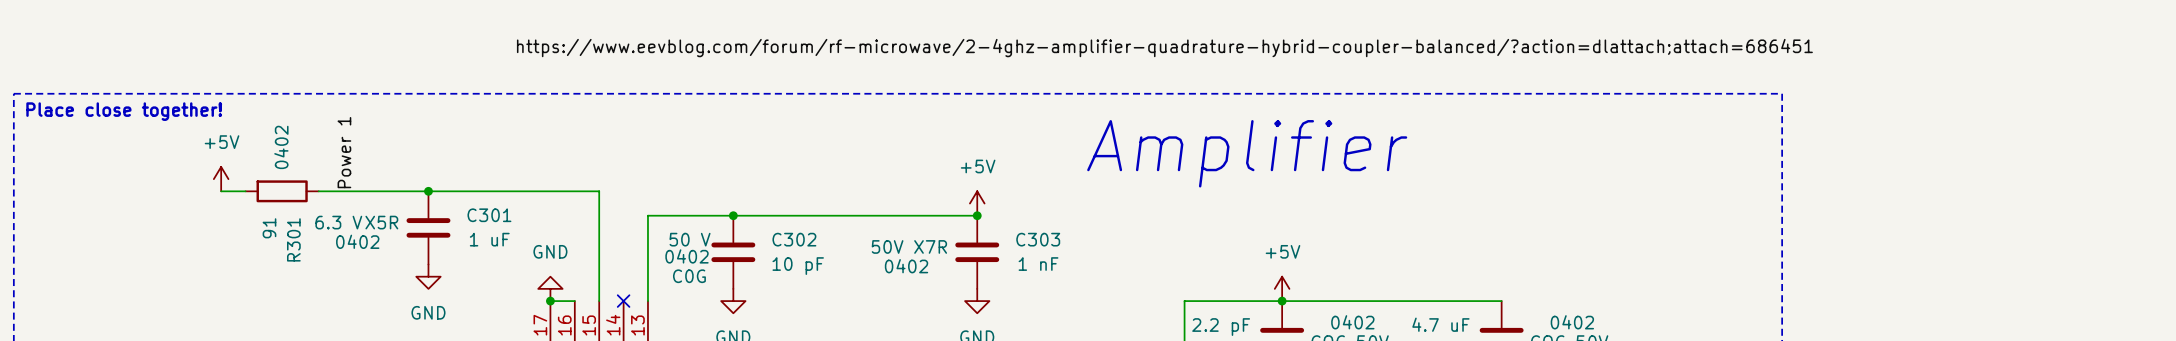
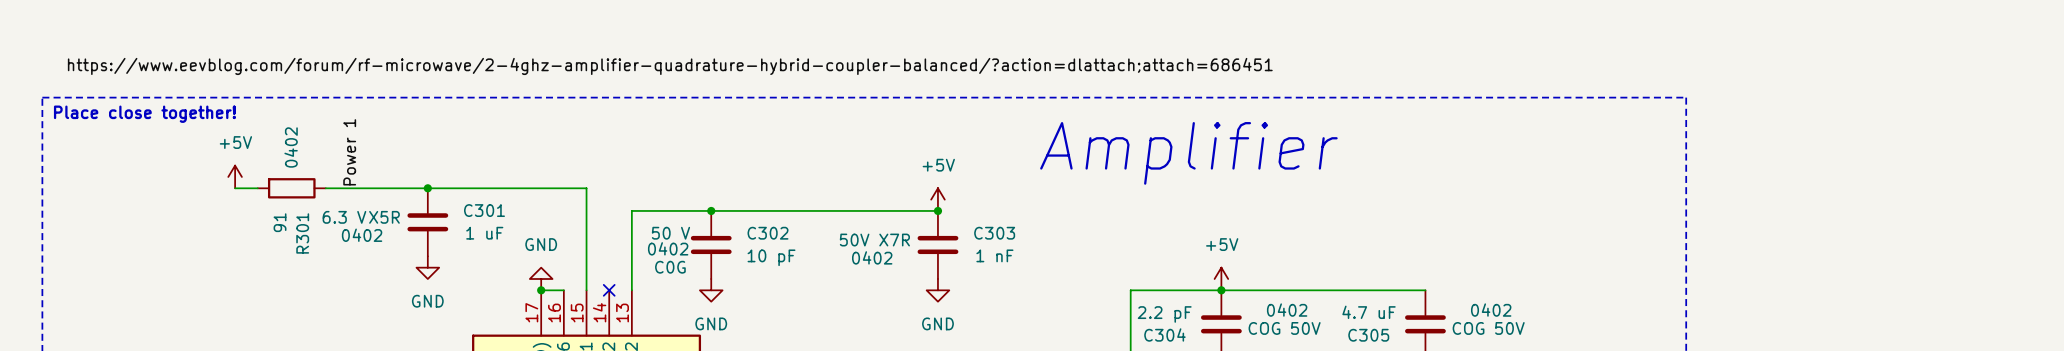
label: https://www.eevblog.com/forum/rf-microwave/2-4ghz-amplifier-quadrature-hybrid-coupler-balanced/?action=dlattach;attach=686451 (1164, 48) -> none
label: none -> https://www.eevblog.com/forum/rf-microwave/2-4ghz-amplifier-quadrature-hybrid-coupler-balanced/?action=dlattach;attach=686451 (670, 66)

